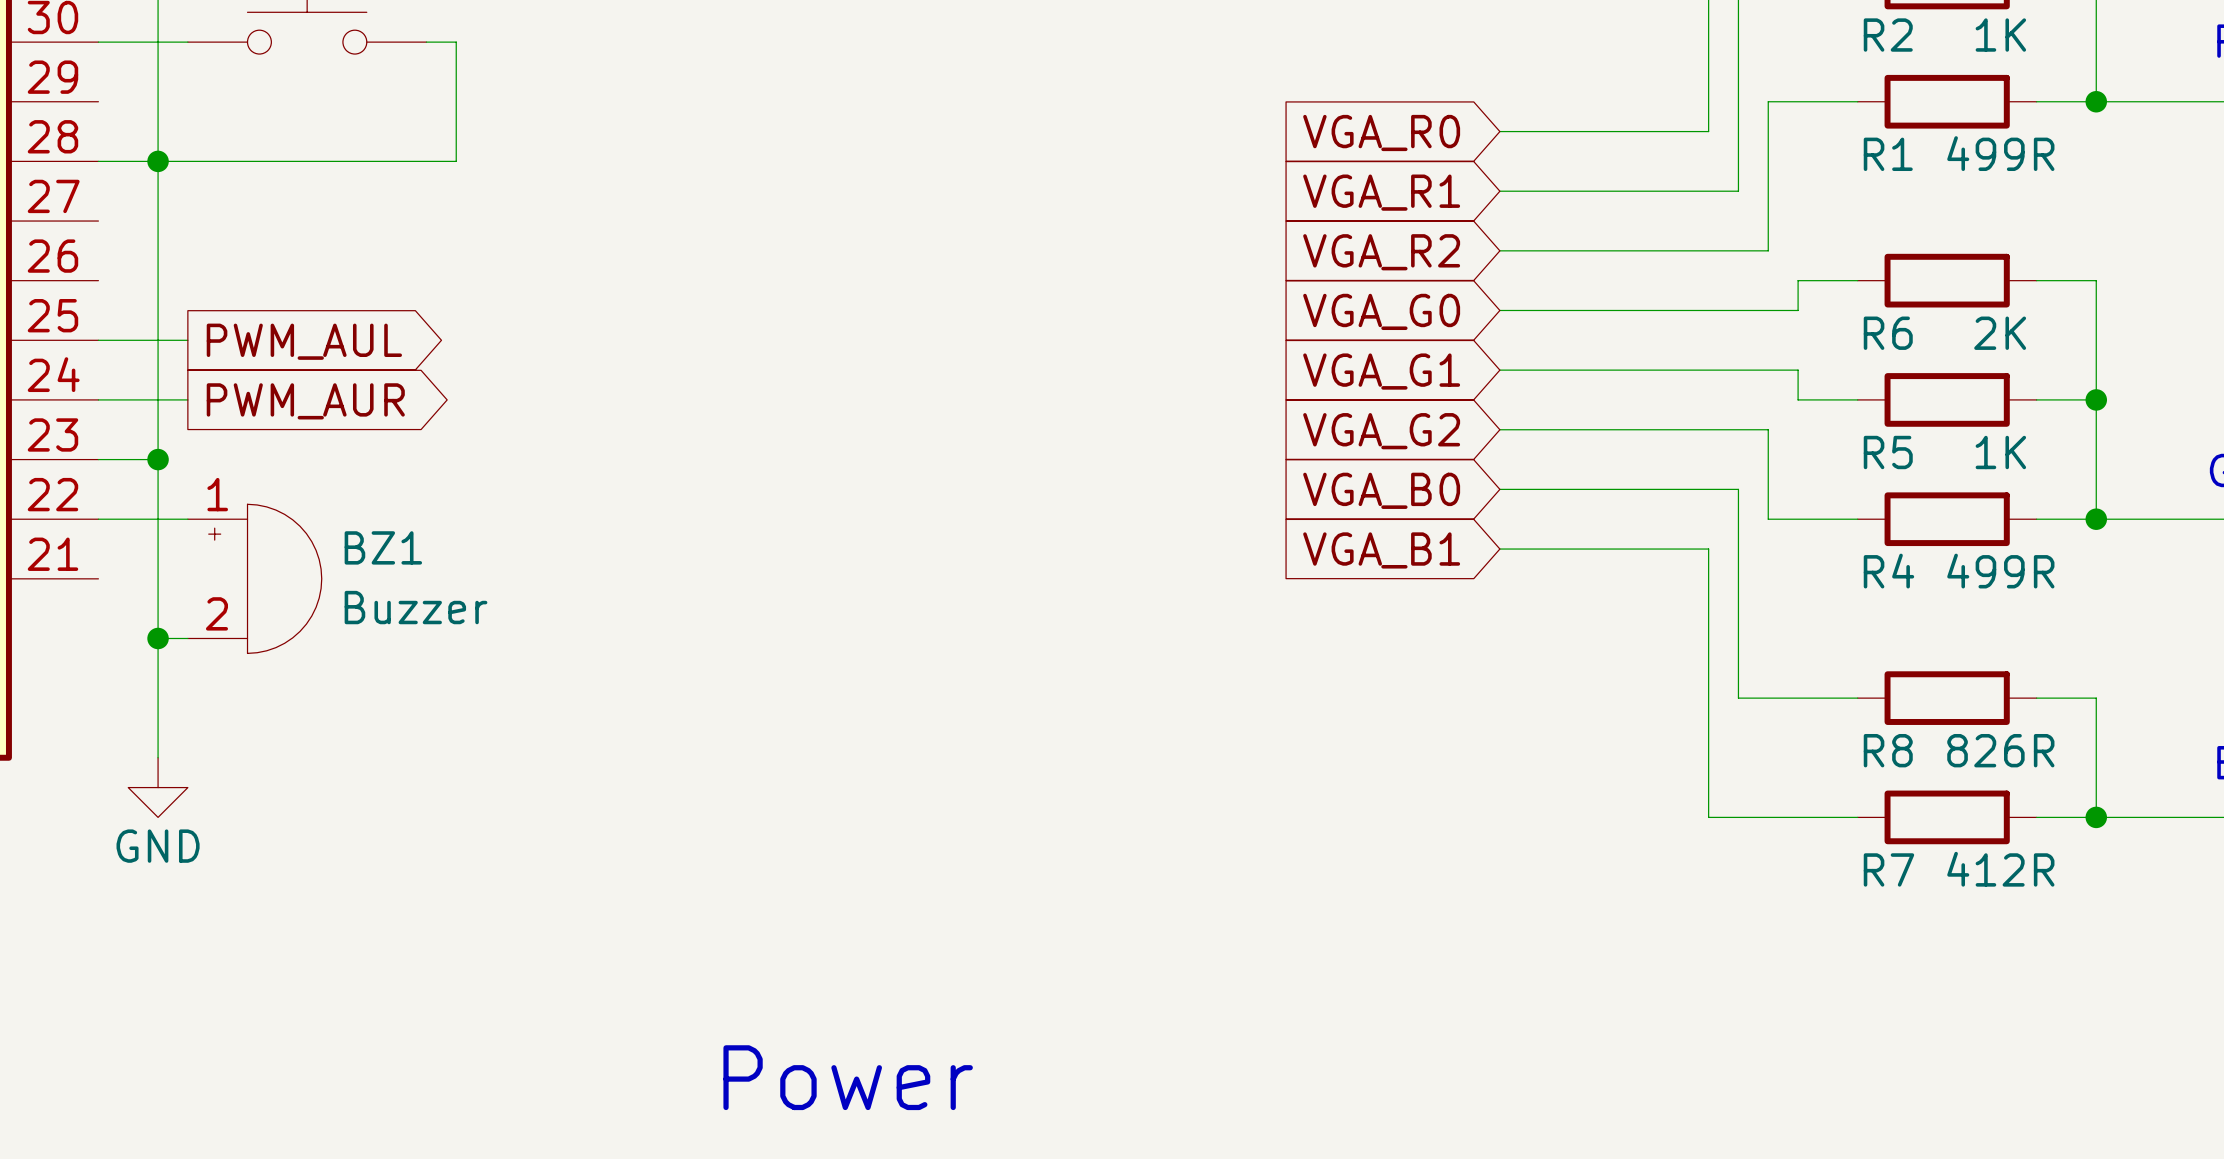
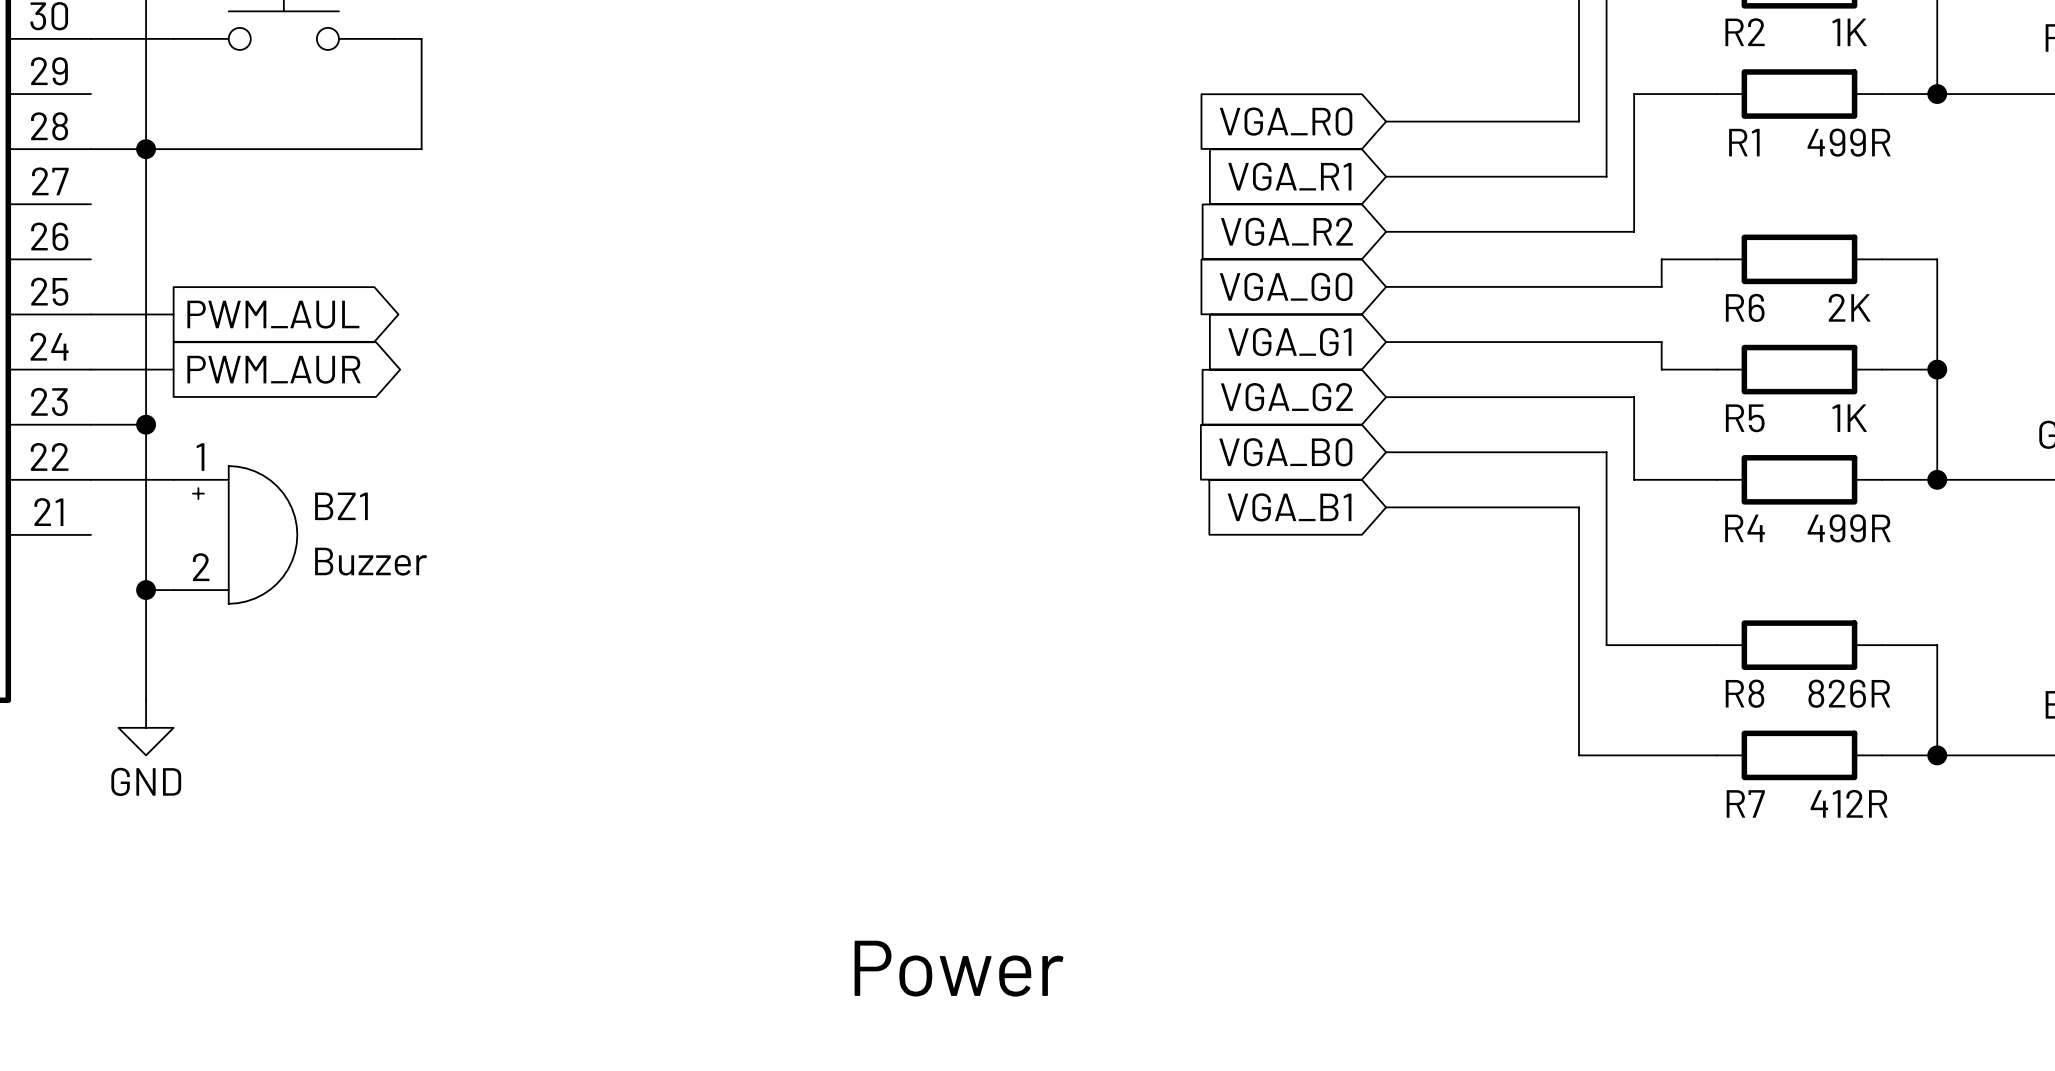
text position: Power (848, 1077) -> Power (959, 968)

